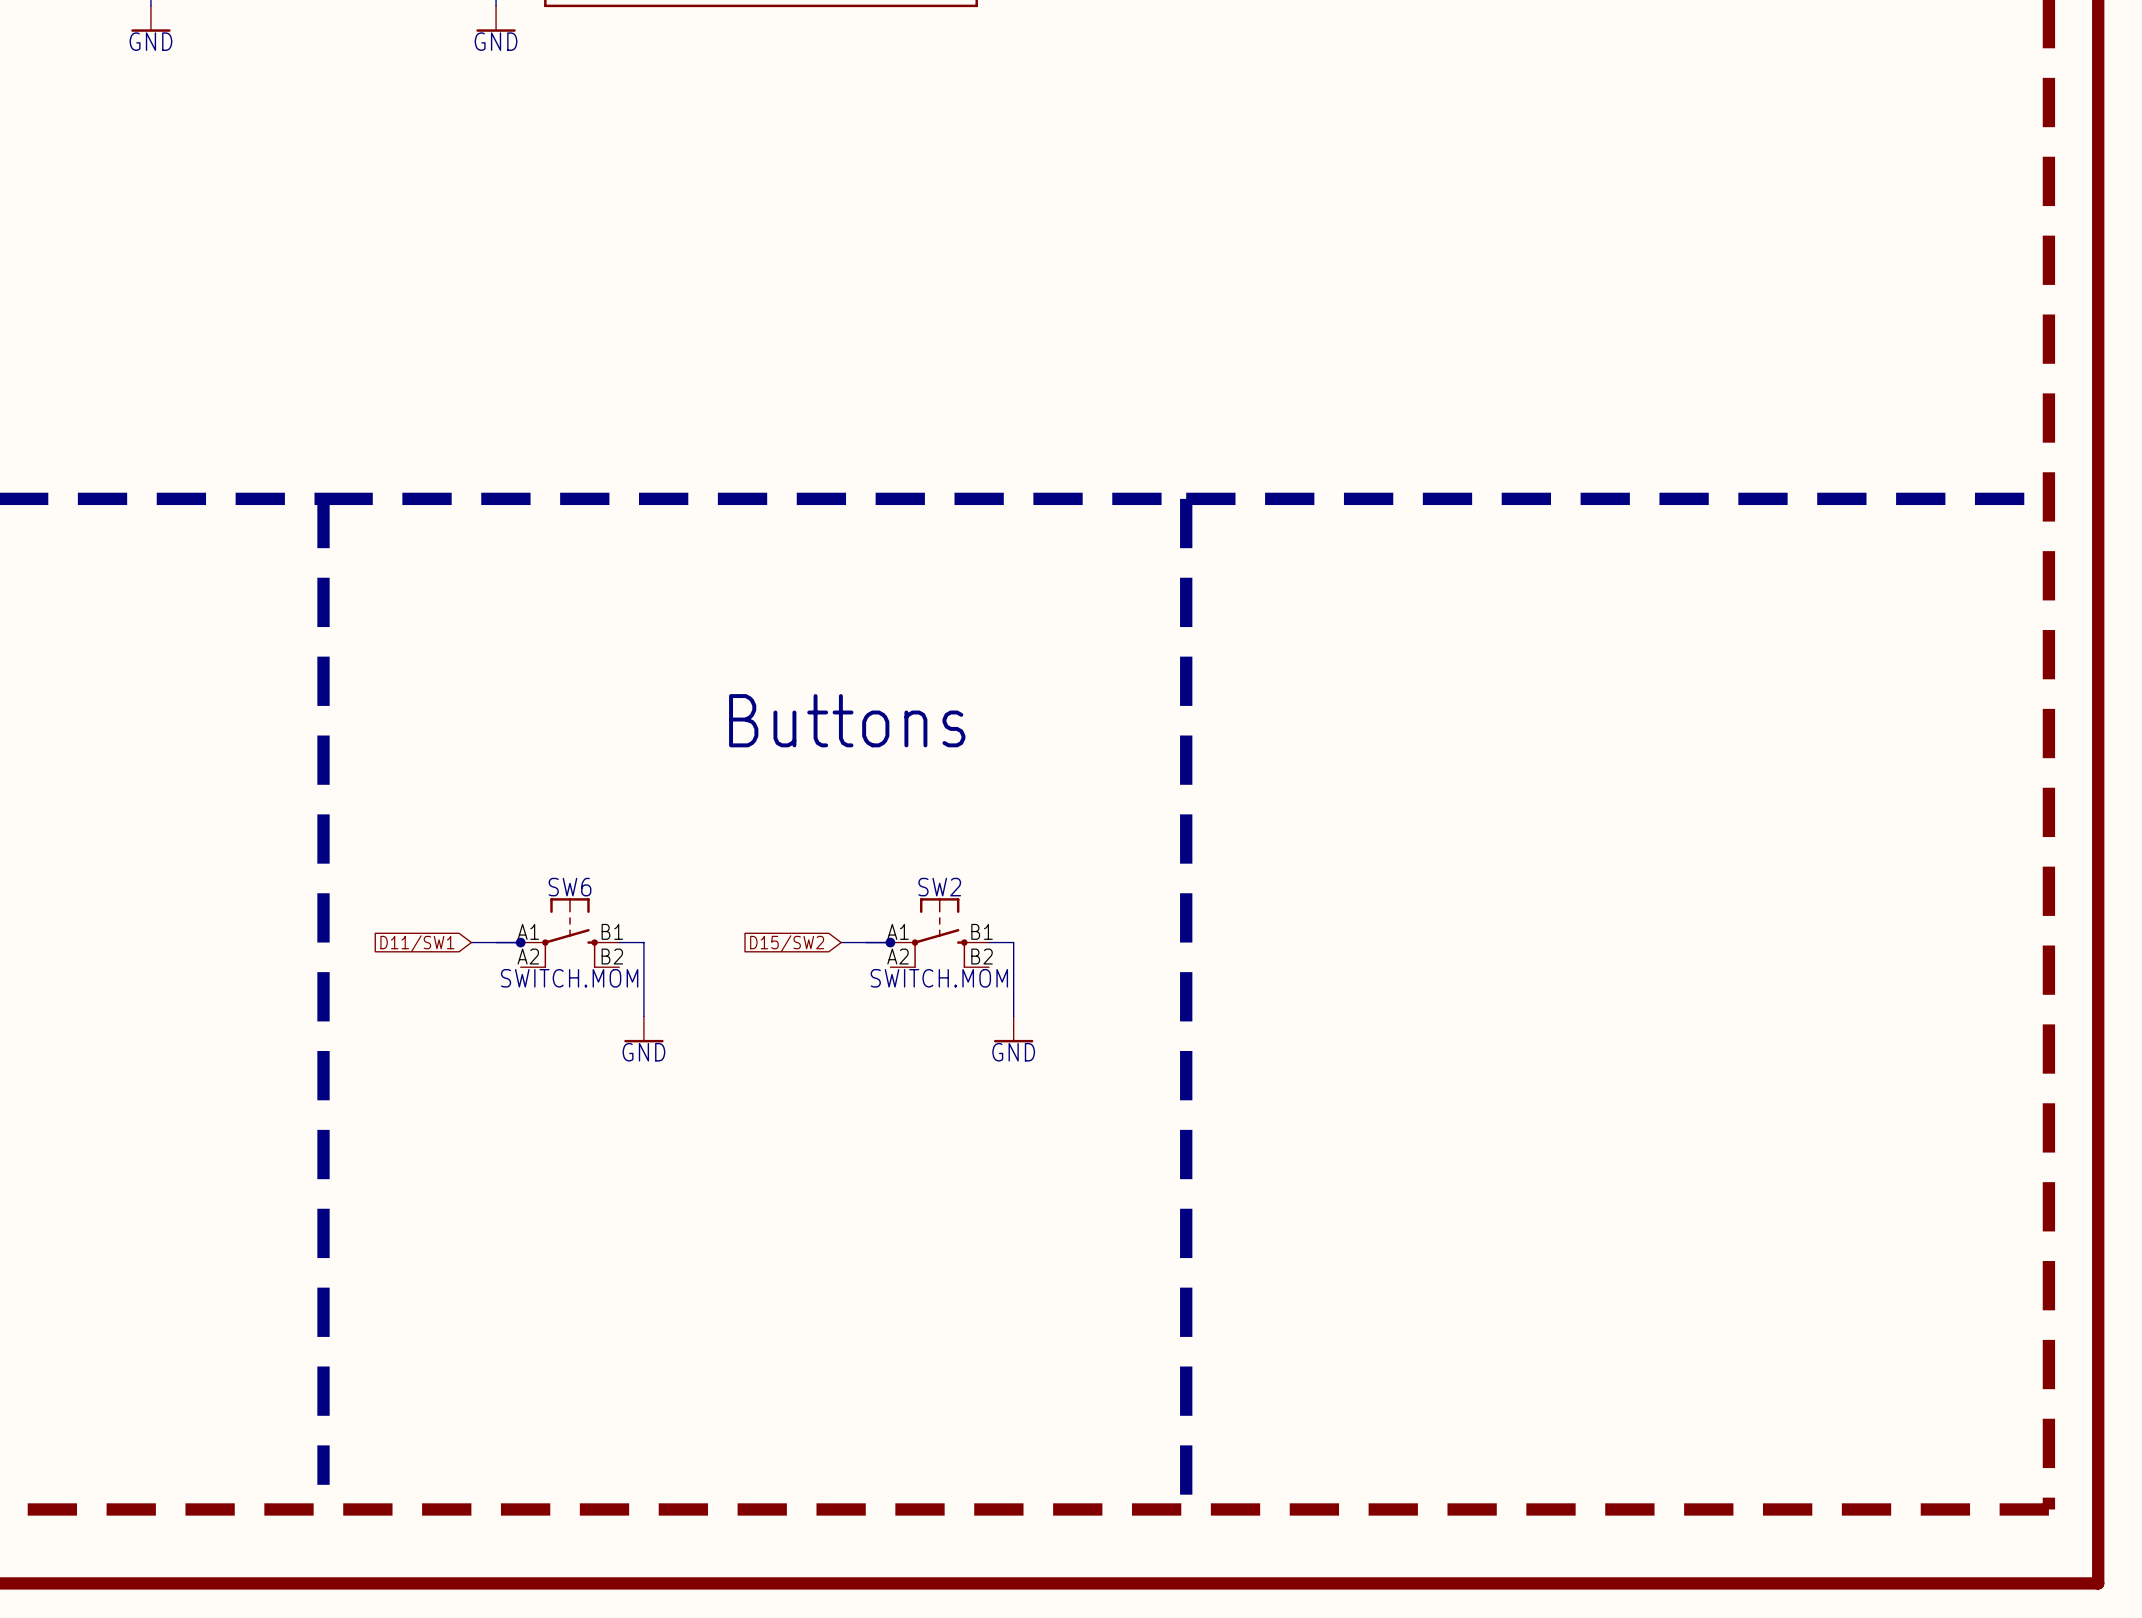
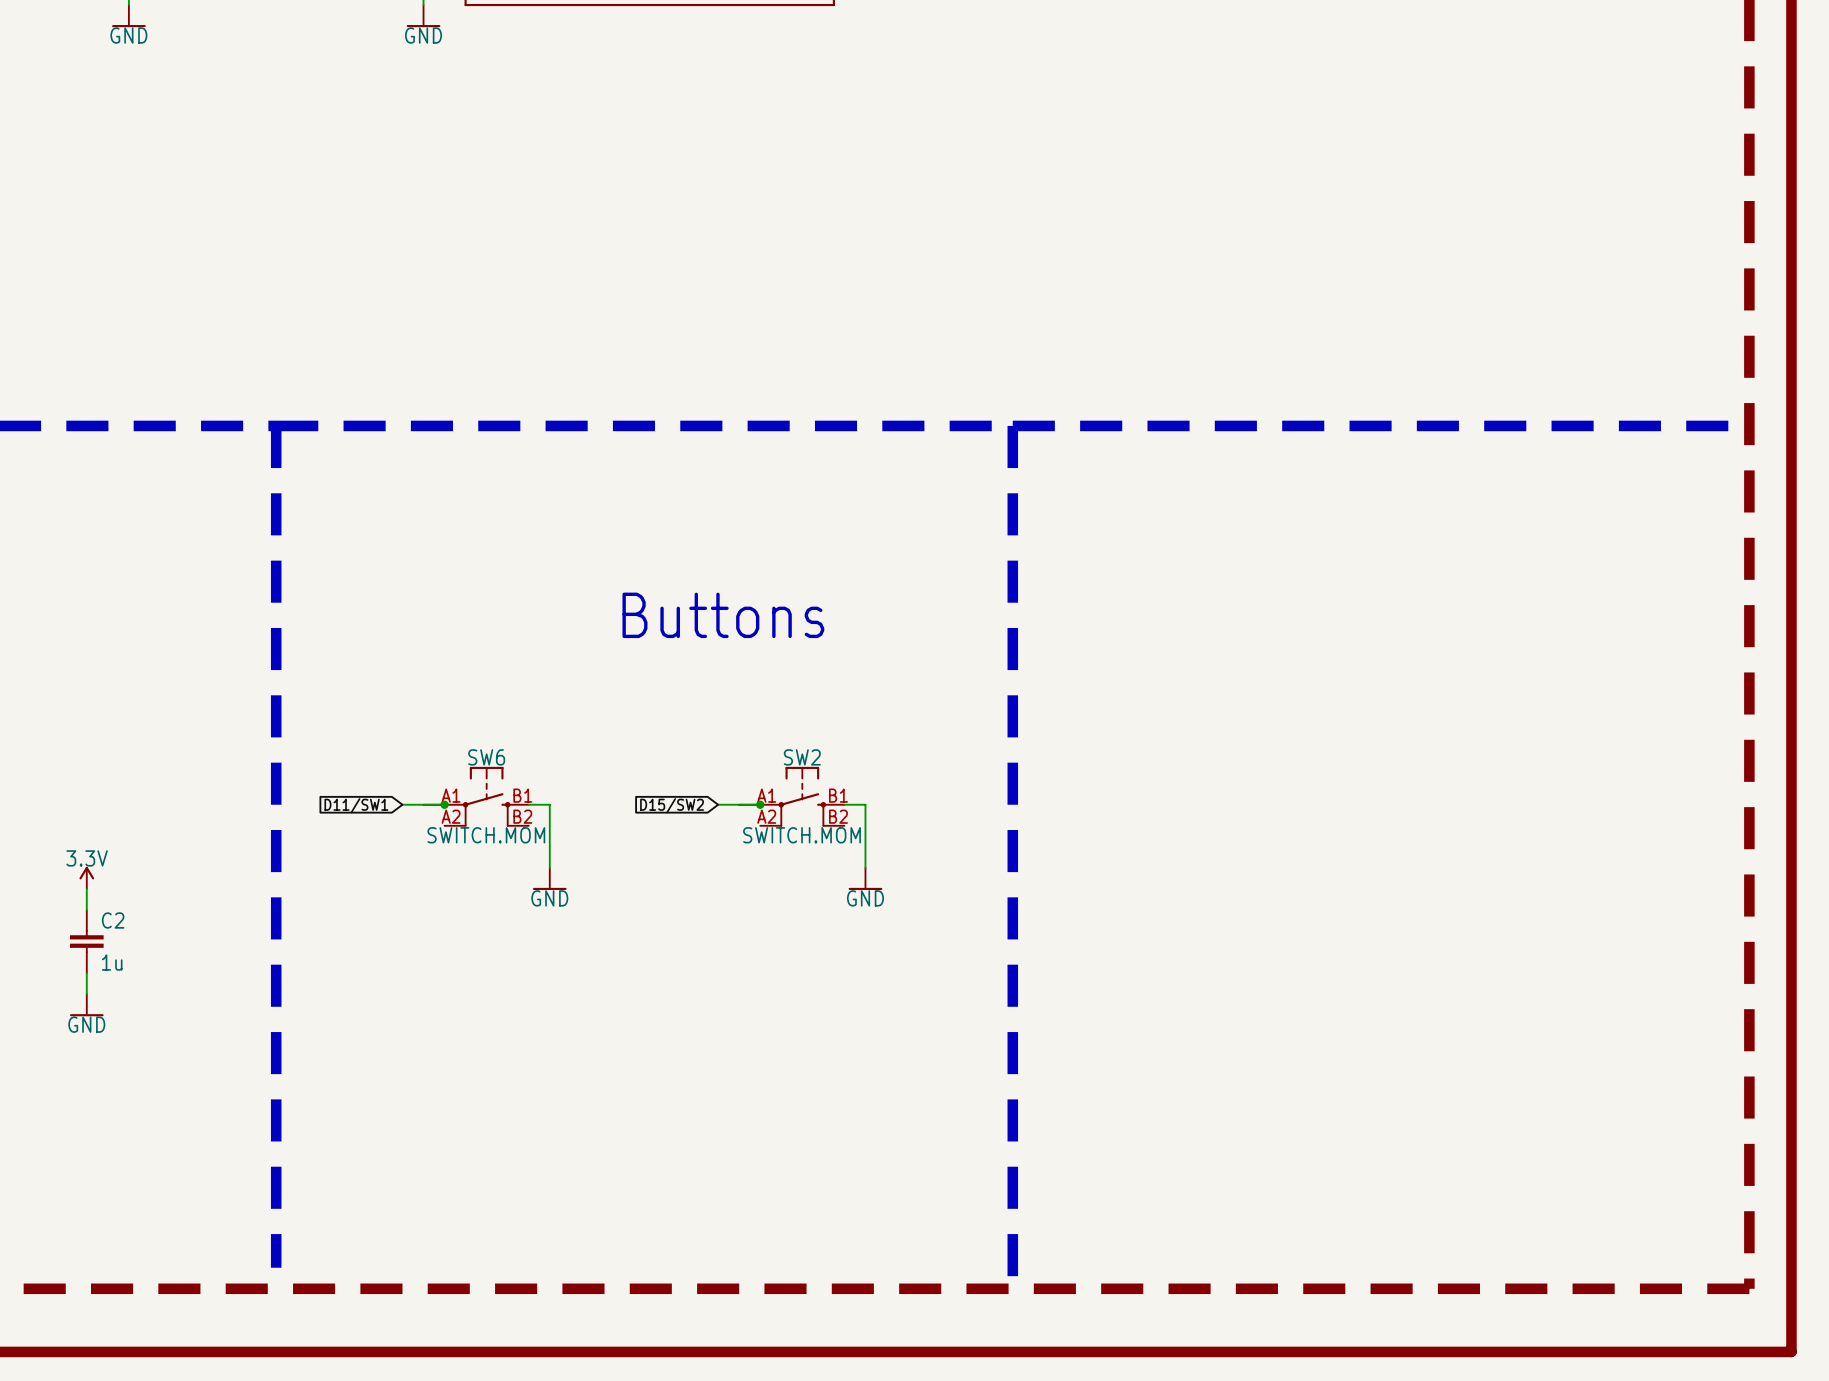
power symbol: none -> 3.3V (86, 877)
wire: none -> (86, 888) (86, 909)
C2: none -> 1u (86, 941)
wire: none -> (86, 973) (86, 994)
power symbol: none -> GND (86, 1005)

